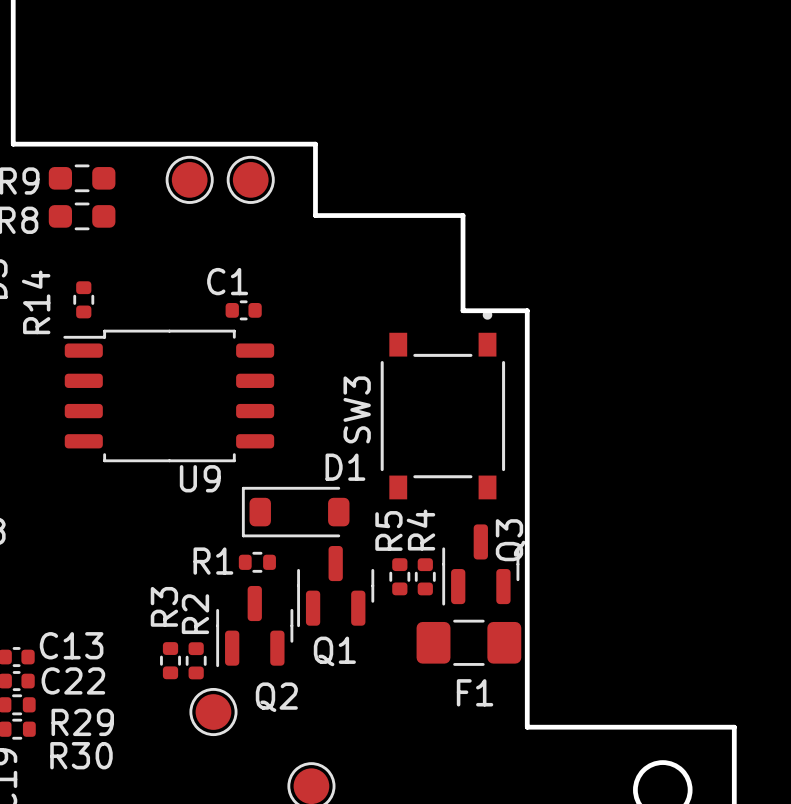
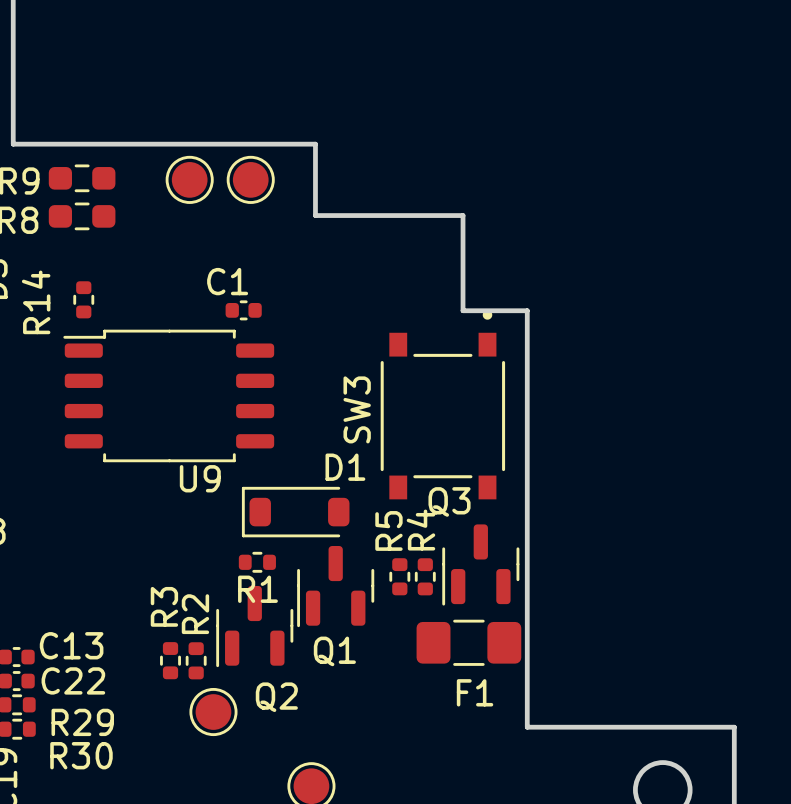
Q3 name rotation: 0° (510, 540) -> 90° clockwise (449, 501)
Q3 name position: Q3 (510, 540) -> Q3 (449, 501)
R1 name position: R1 (213, 561) -> R1 (257, 589)

